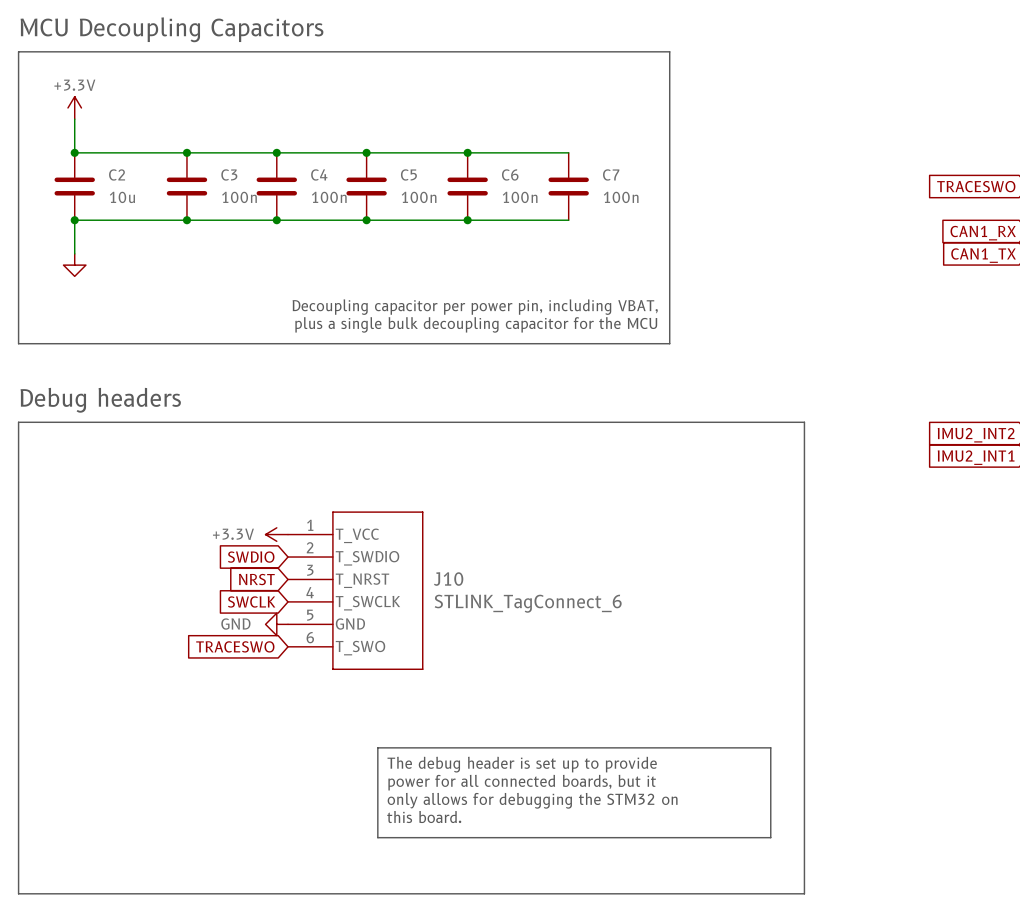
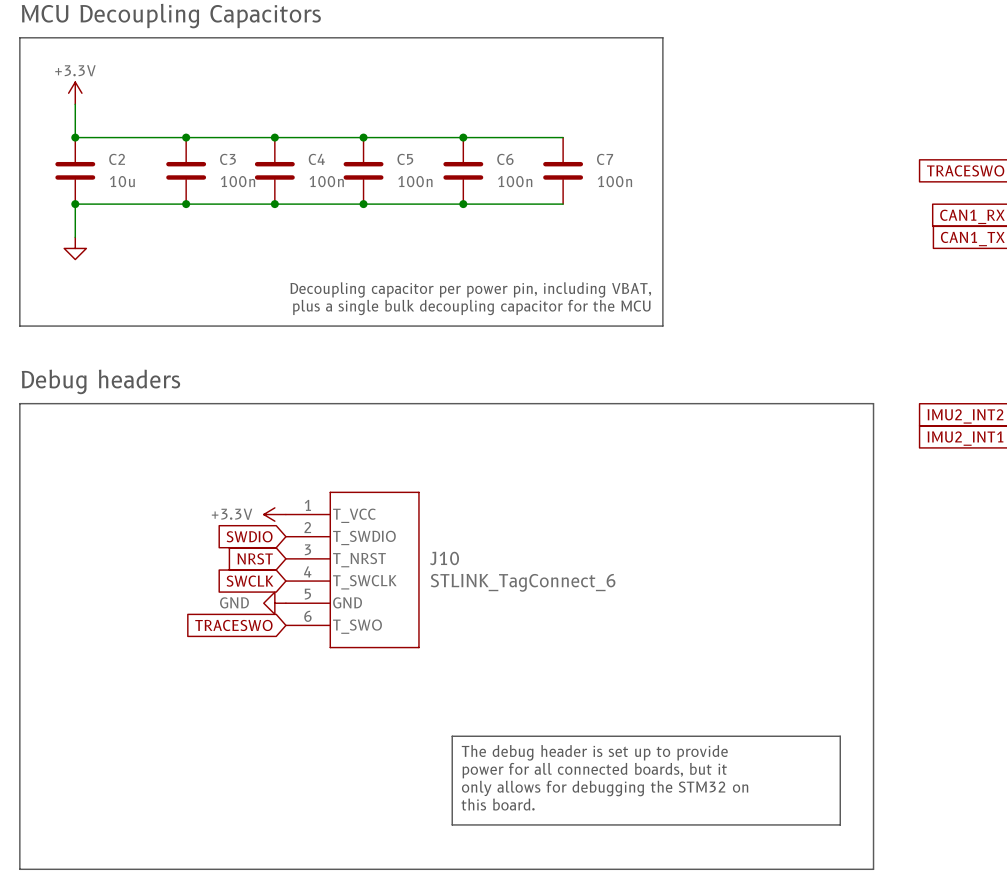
line: (804, 422) (804, 893) -> (795, 403) (873, 403) (873, 869) (795, 869)
line: (377, 747) (770, 747) (770, 837) (377, 837) (377, 747) -> (452, 736) (840, 736) (840, 824) (452, 824) (452, 736)
text position: The debug header is set up to provide (522, 764) -> The debug header is set up to provide (594, 752)
text position: power for all connected boards, but it (522, 782) -> power for all connected boards, but it (594, 770)
text position: only allows for debugging the STM32 on (532, 800) -> only allows for debugging the STM32 on (605, 788)
text position: this board. (424, 817) -> this board. (498, 804)

